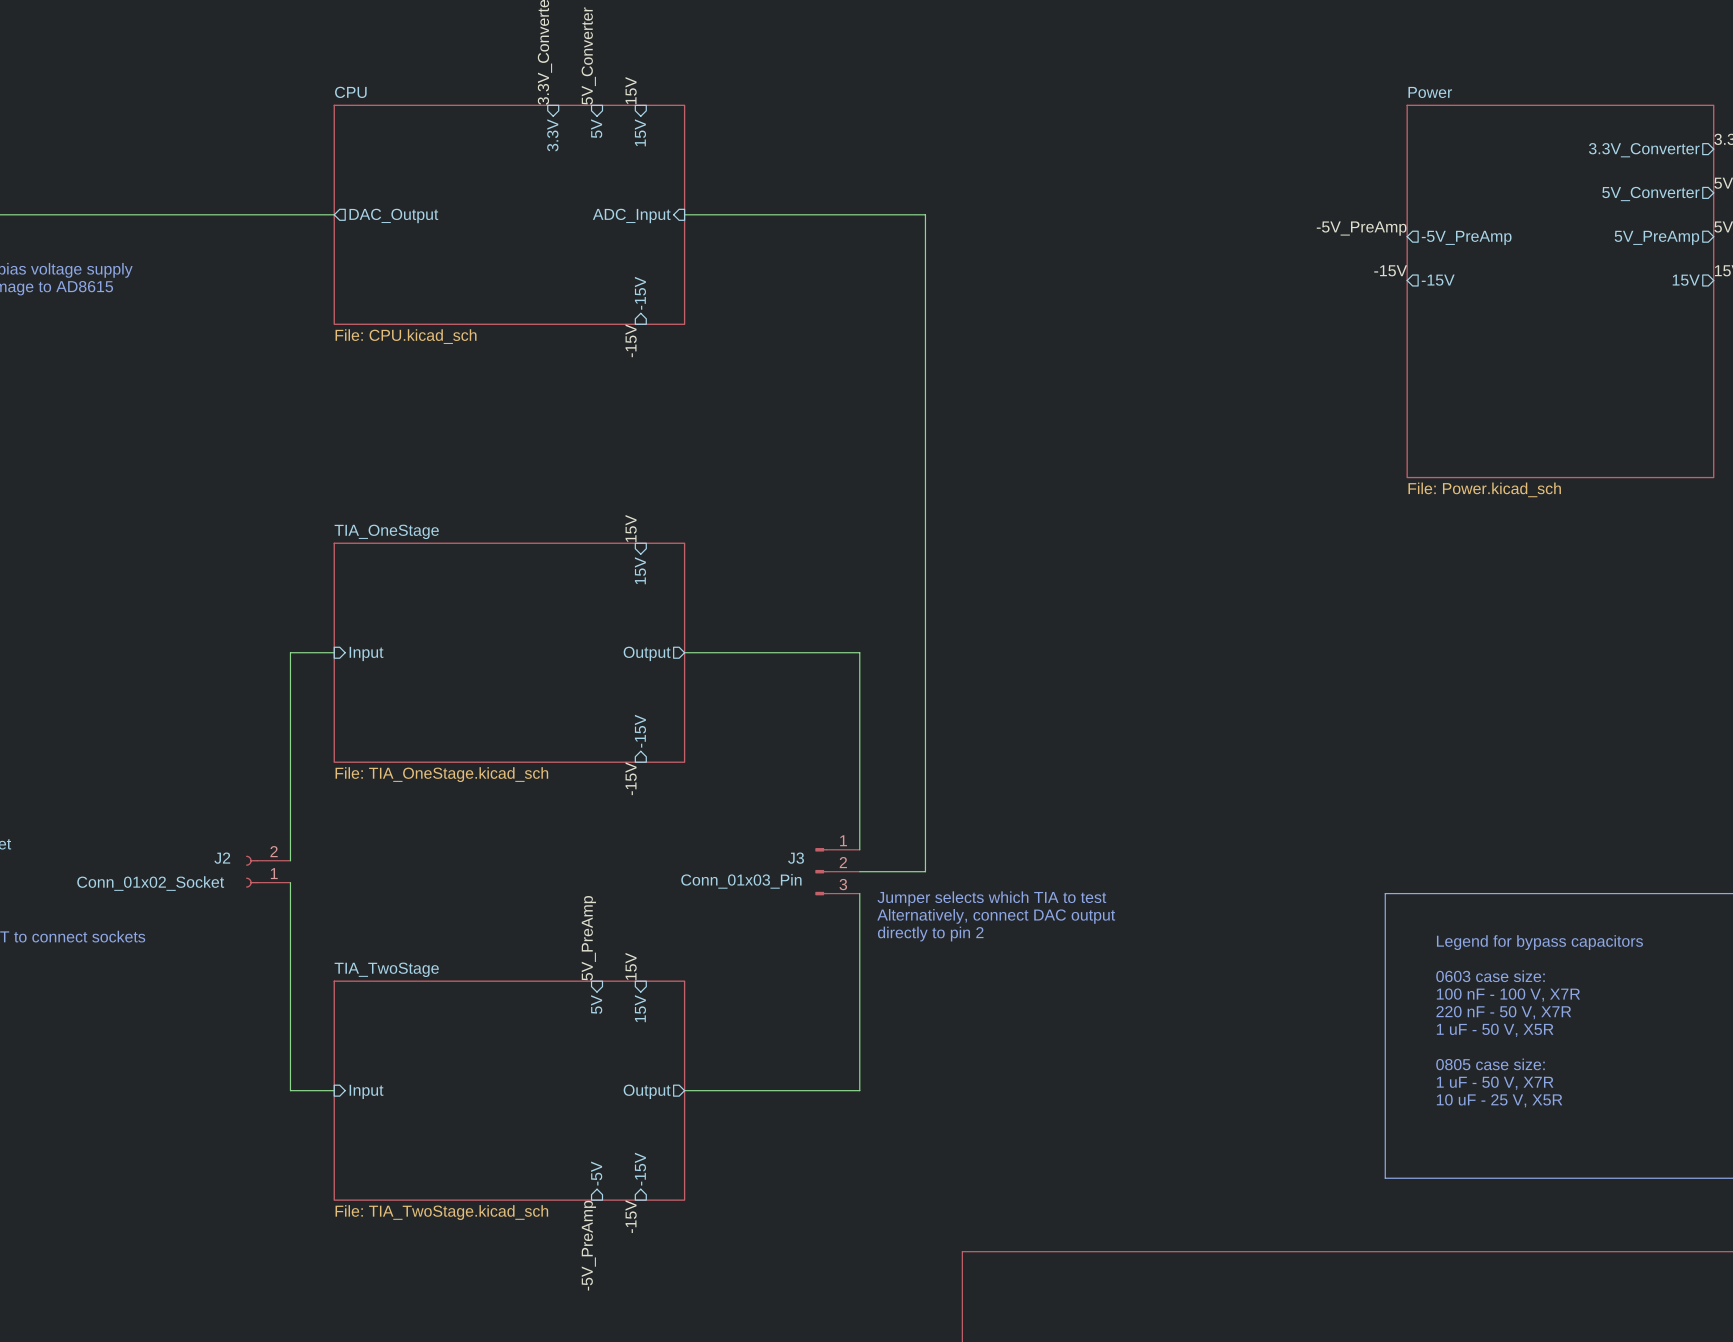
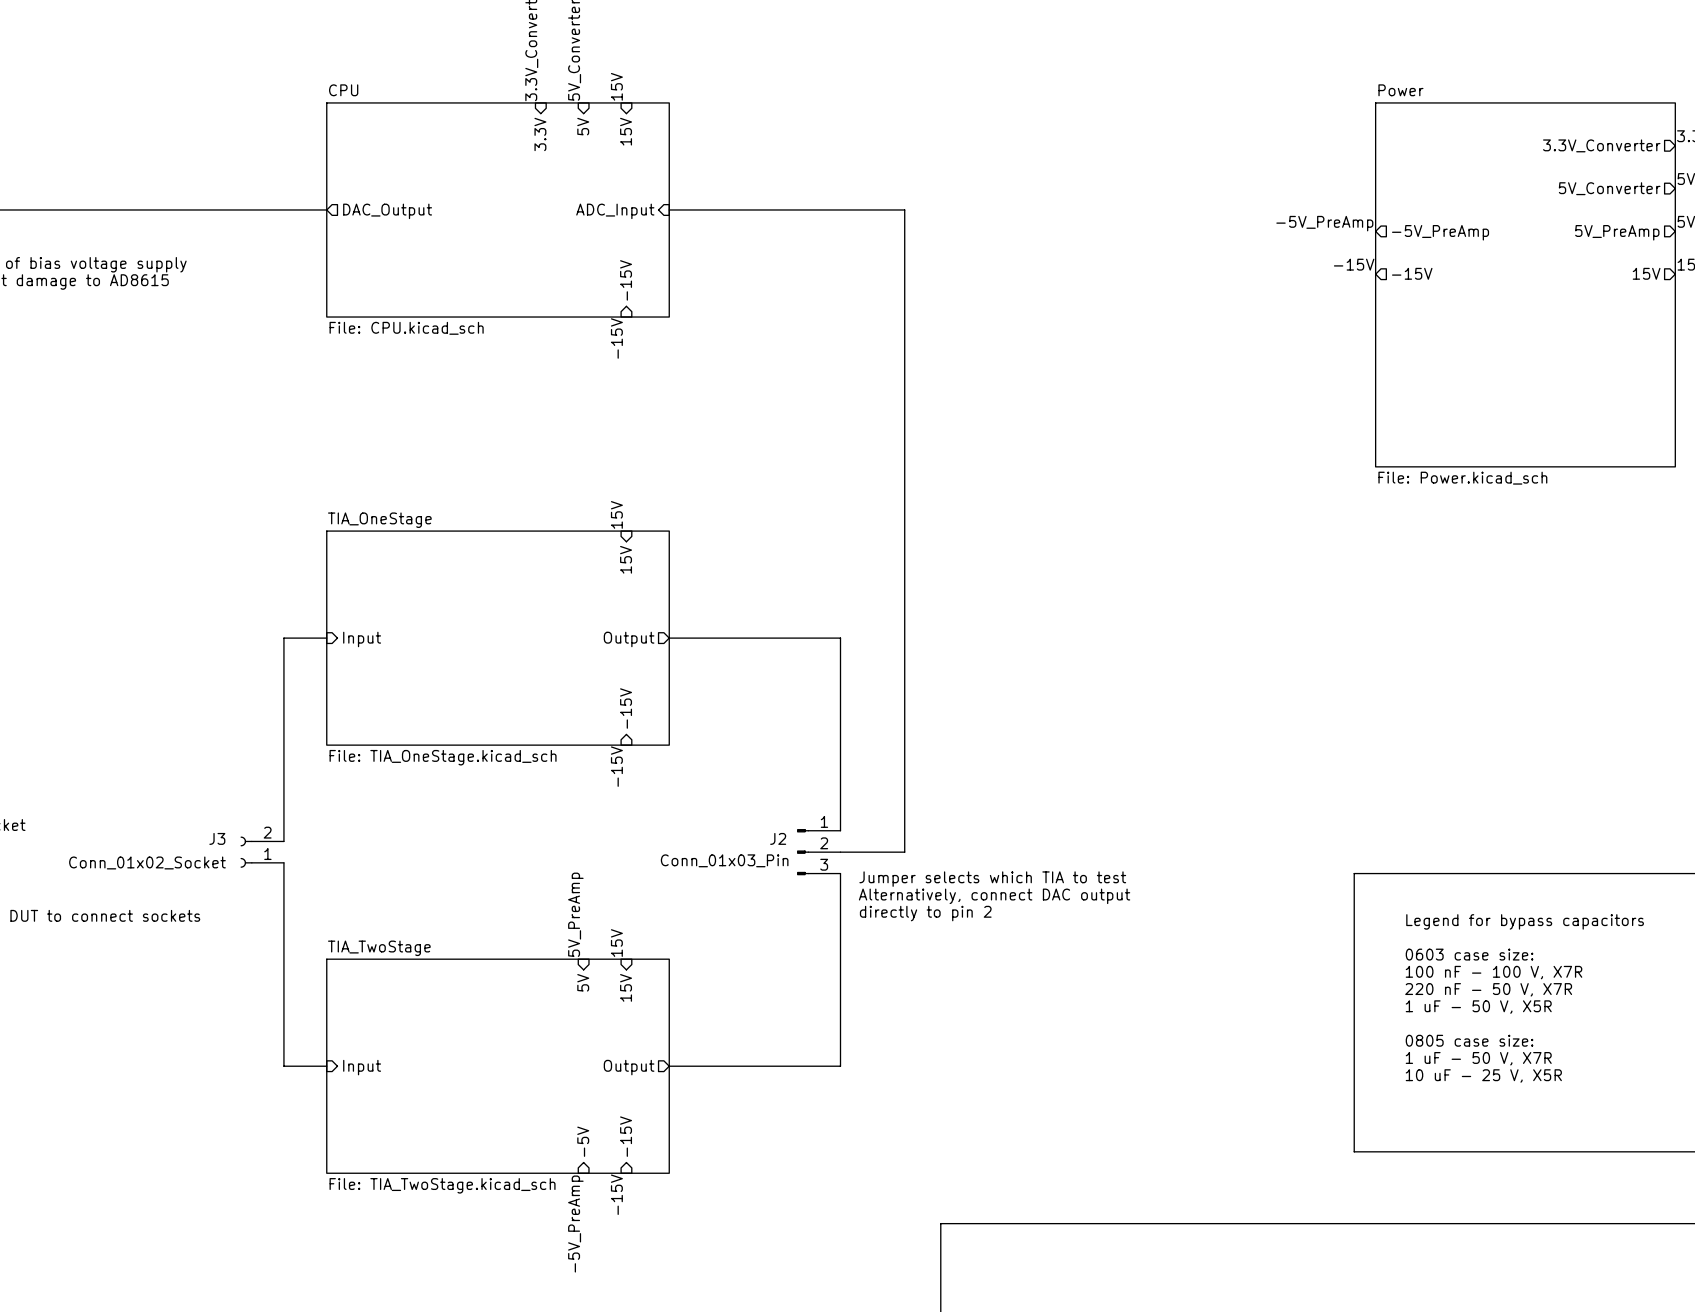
J2 name: J2 (222, 858) -> J3 (217, 838)
J3 name: J3 (796, 858) -> J2 (778, 838)

